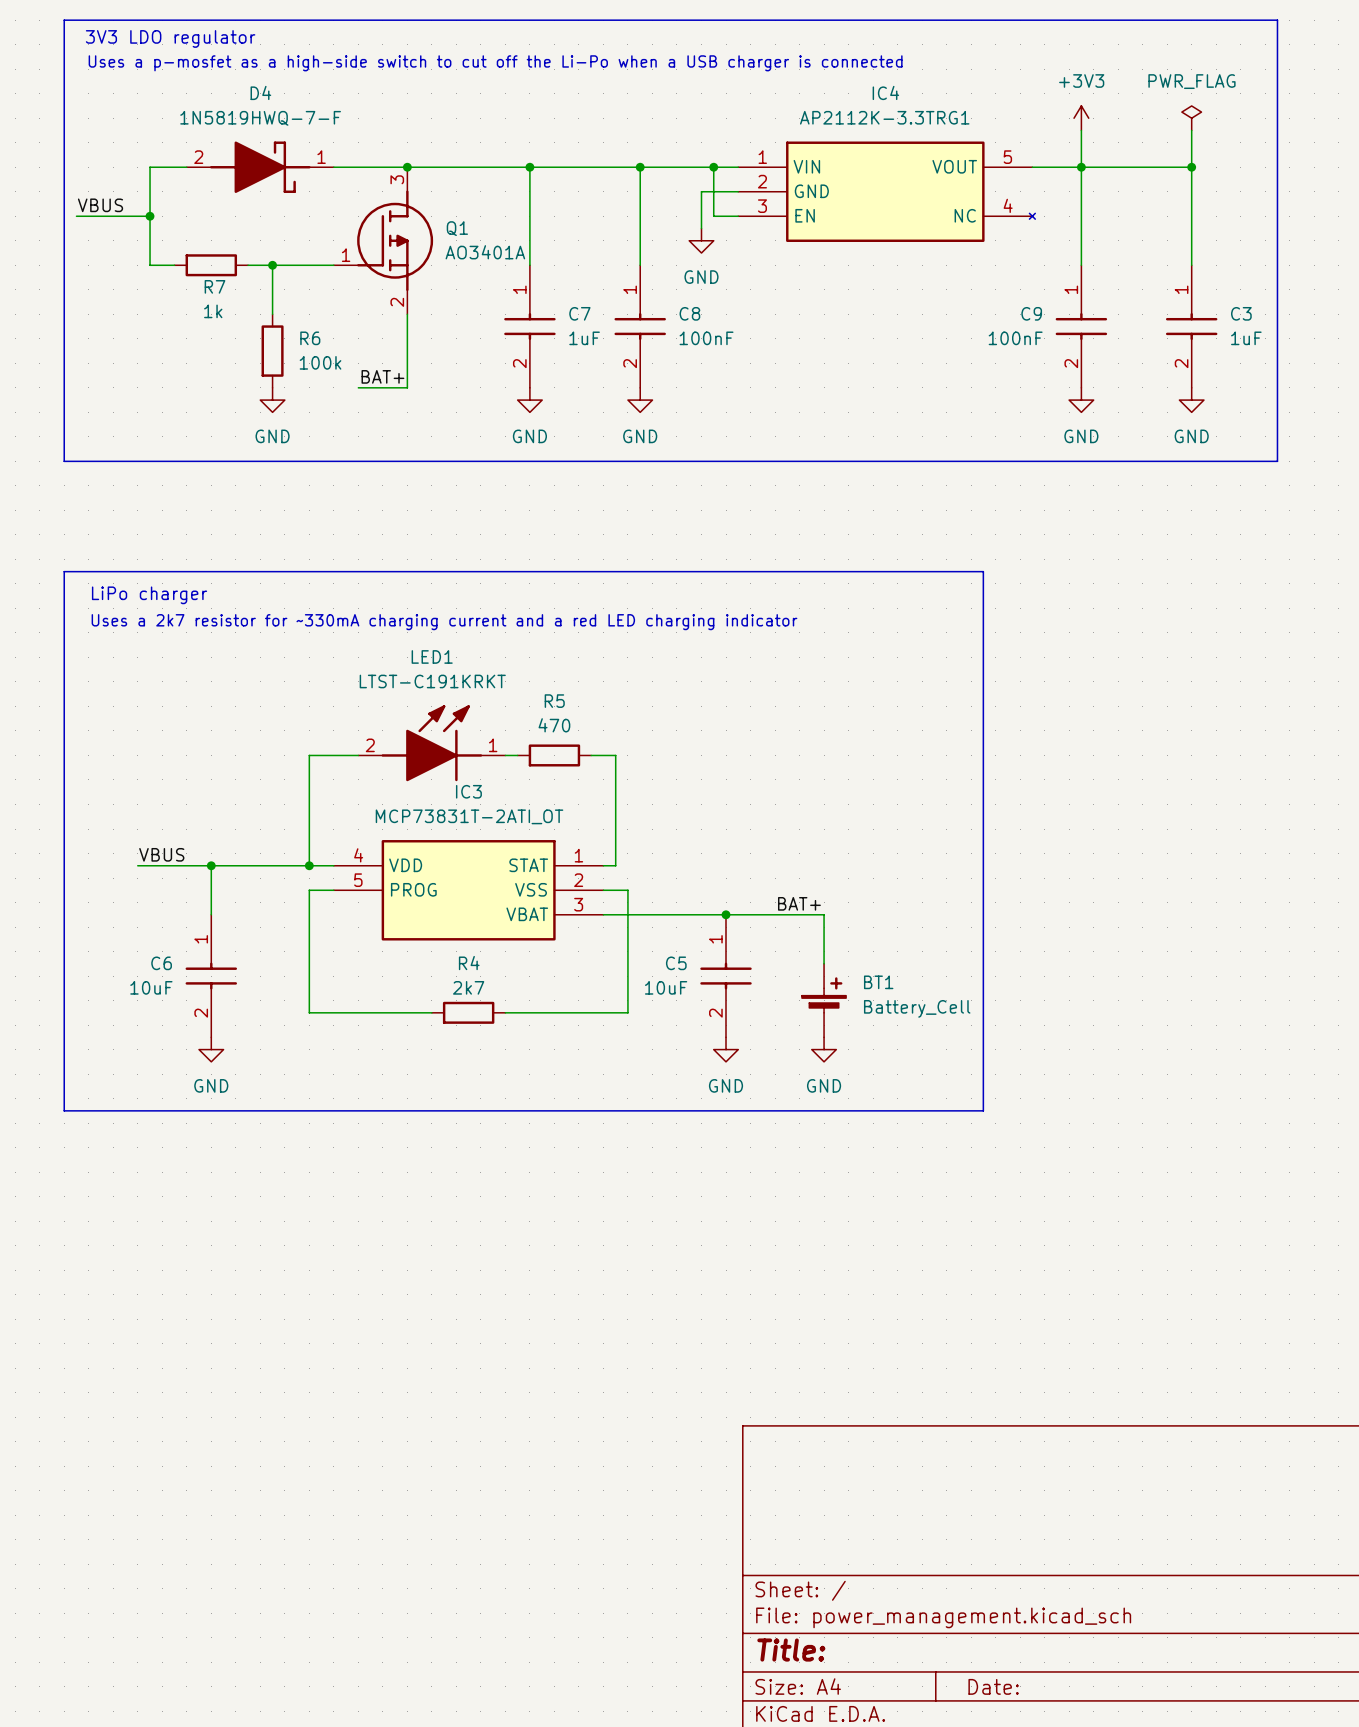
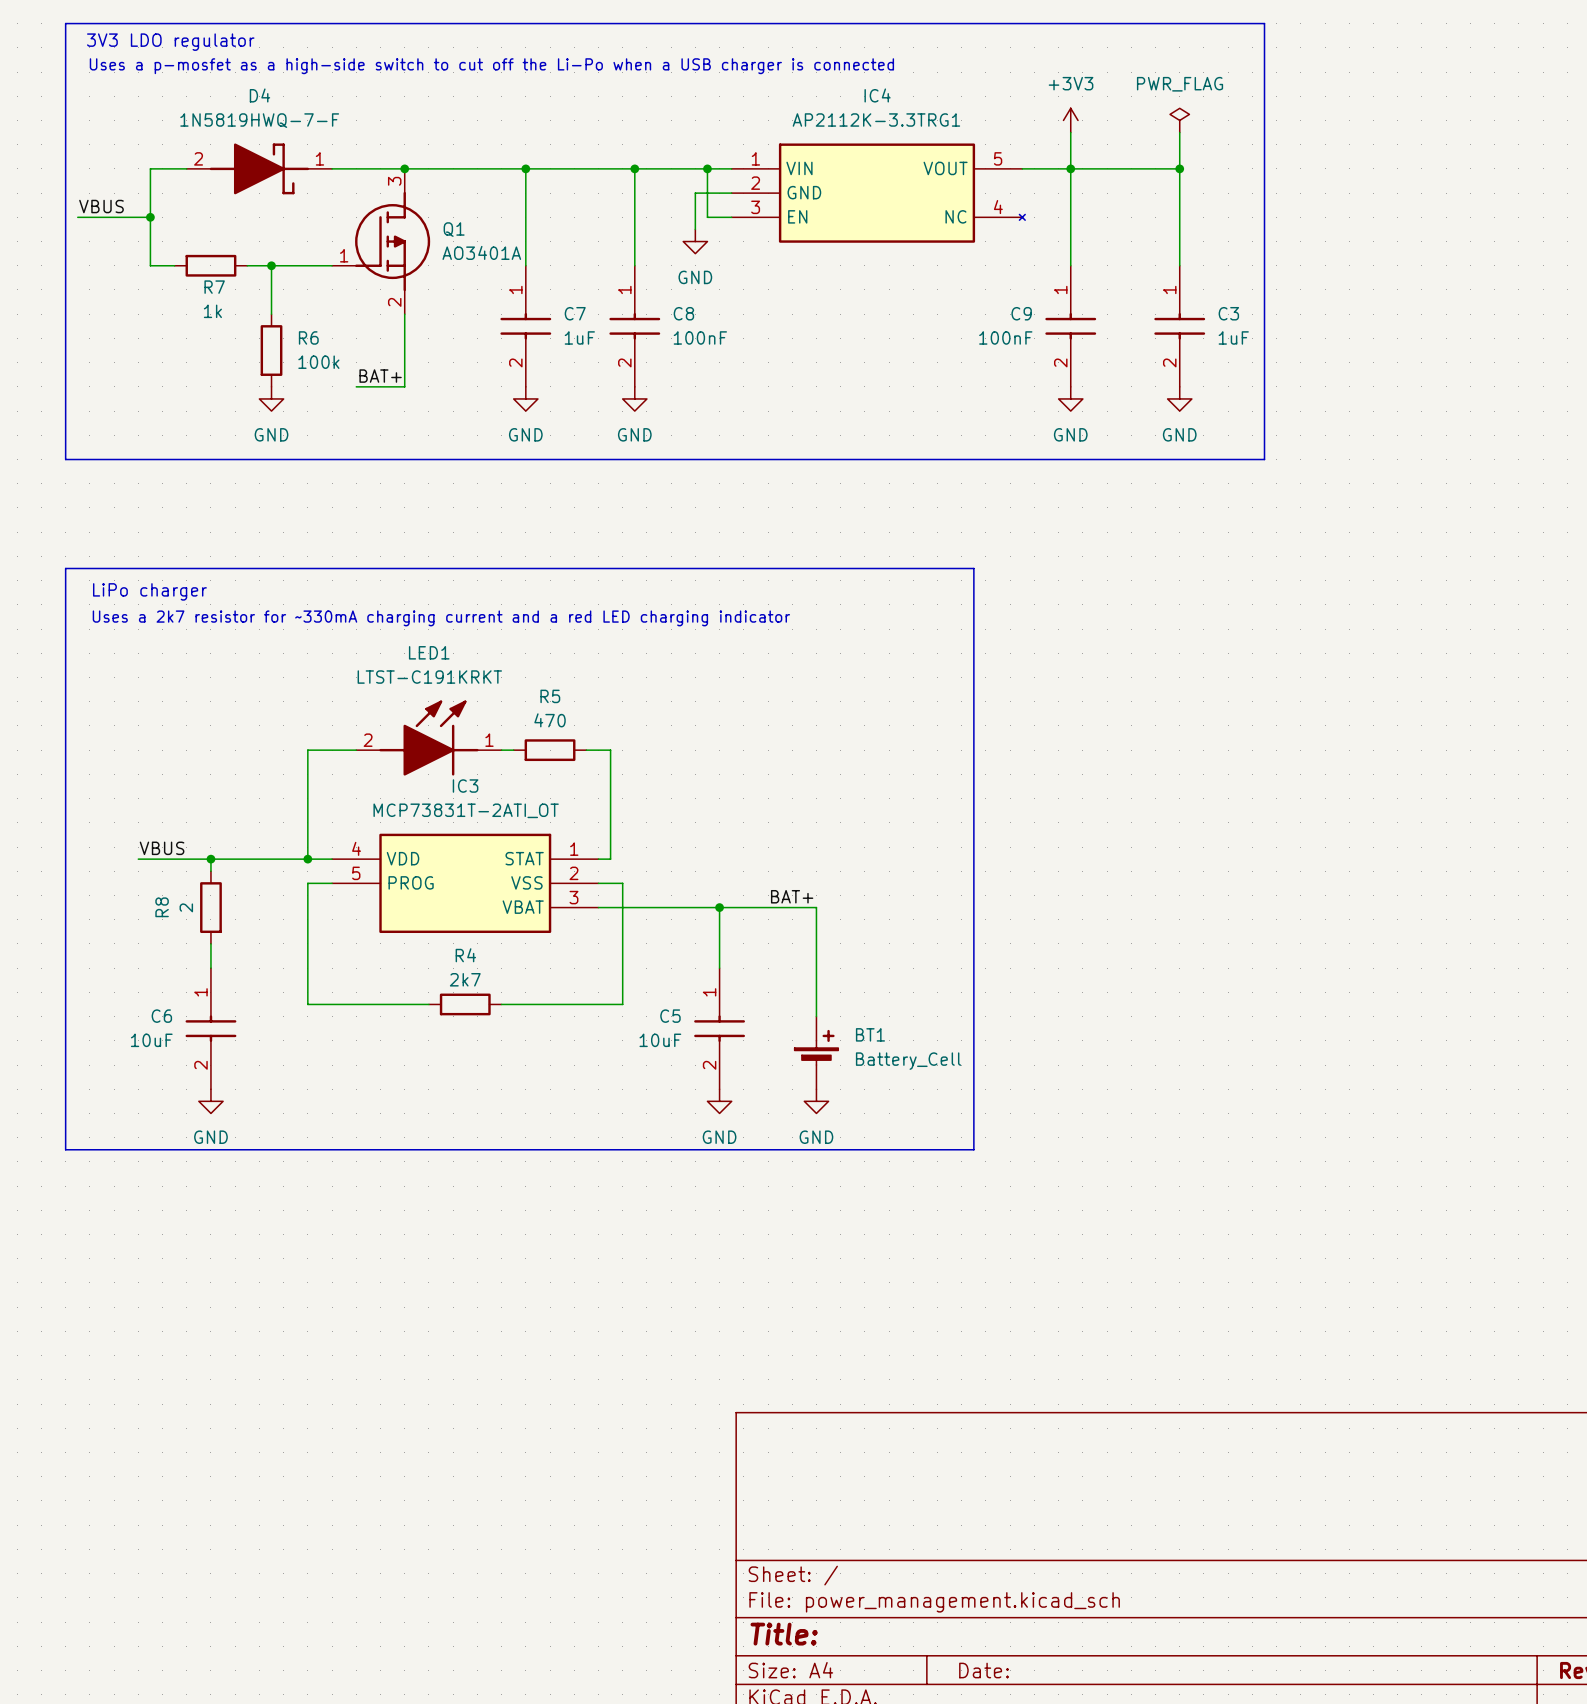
wire: (211, 878) (211, 914) -> none
R8: none -> 2 (210, 907)
C6 position: (211, 976) -> (210, 1028)
C5 position: (726, 976) -> (719, 1028)
BT1 position: (824, 1000) -> (816, 1052)
power symbol position: GND (211, 1049) -> GND (210, 1101)
power symbol: GND (726, 1049) -> none
power symbol: GND (824, 1049) -> none
line: (64, 1110) (983, 1110) -> (65, 1101) (65, 1149) (973, 1149) (973, 1101)
power symbol: none -> GND (719, 1101)
power symbol: none -> GND (816, 1101)

